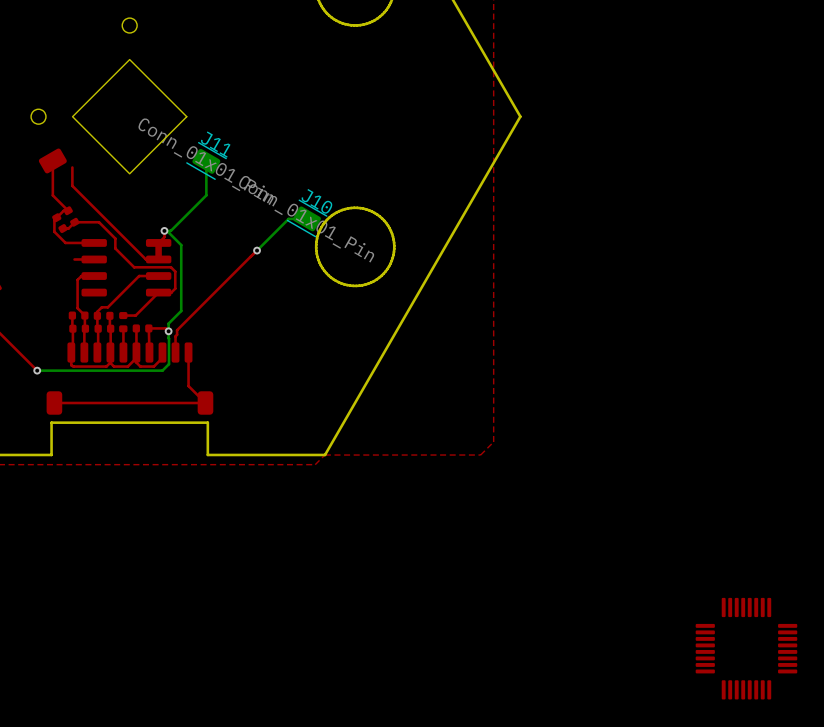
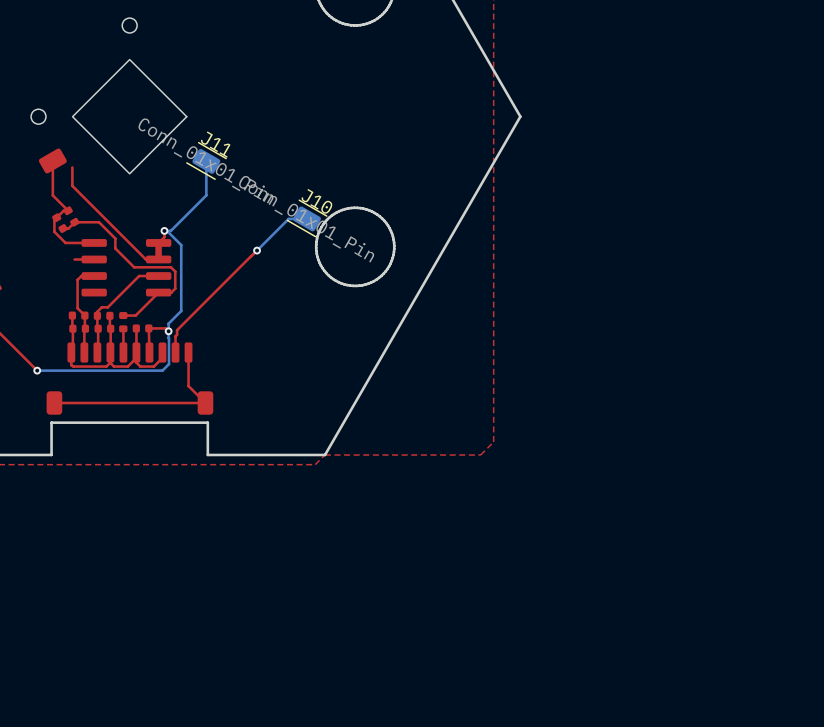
part: (746, 648) -> none

